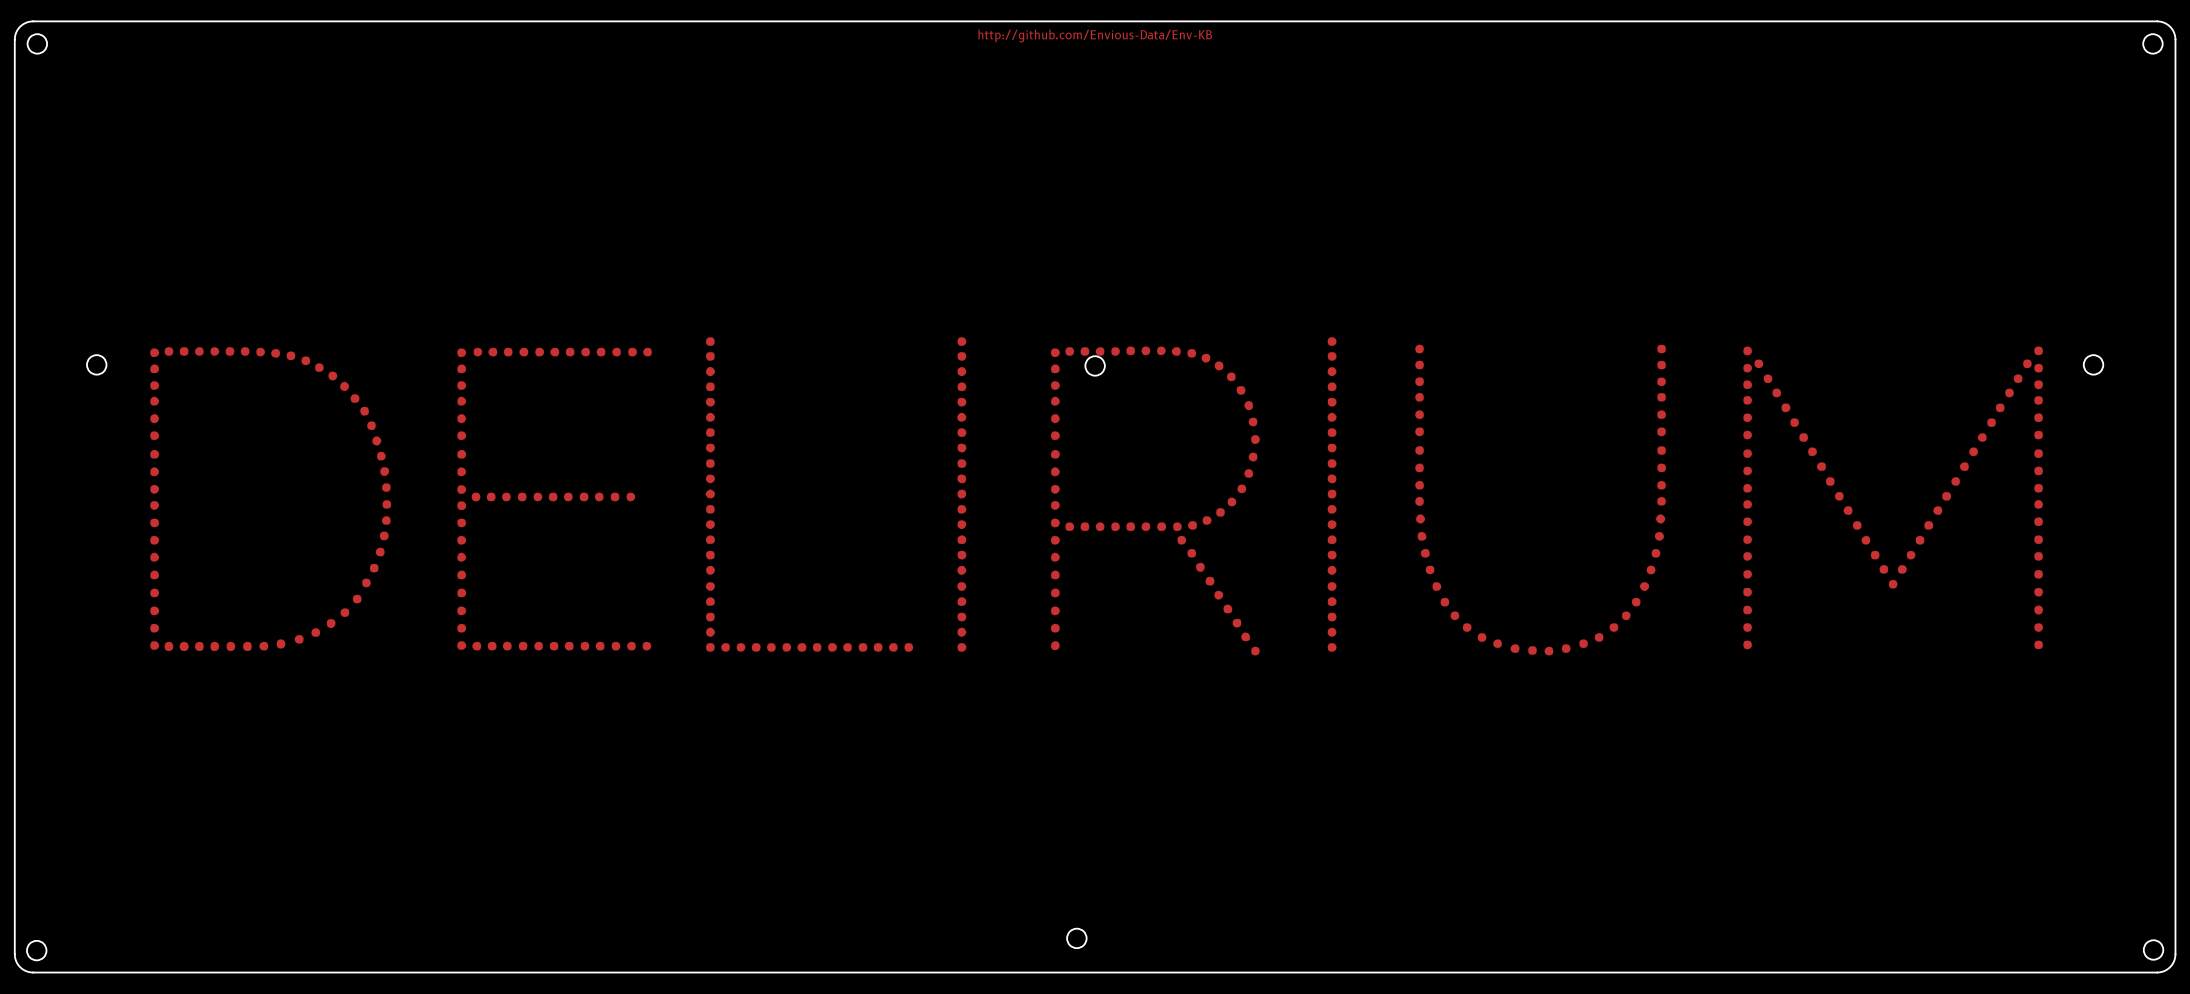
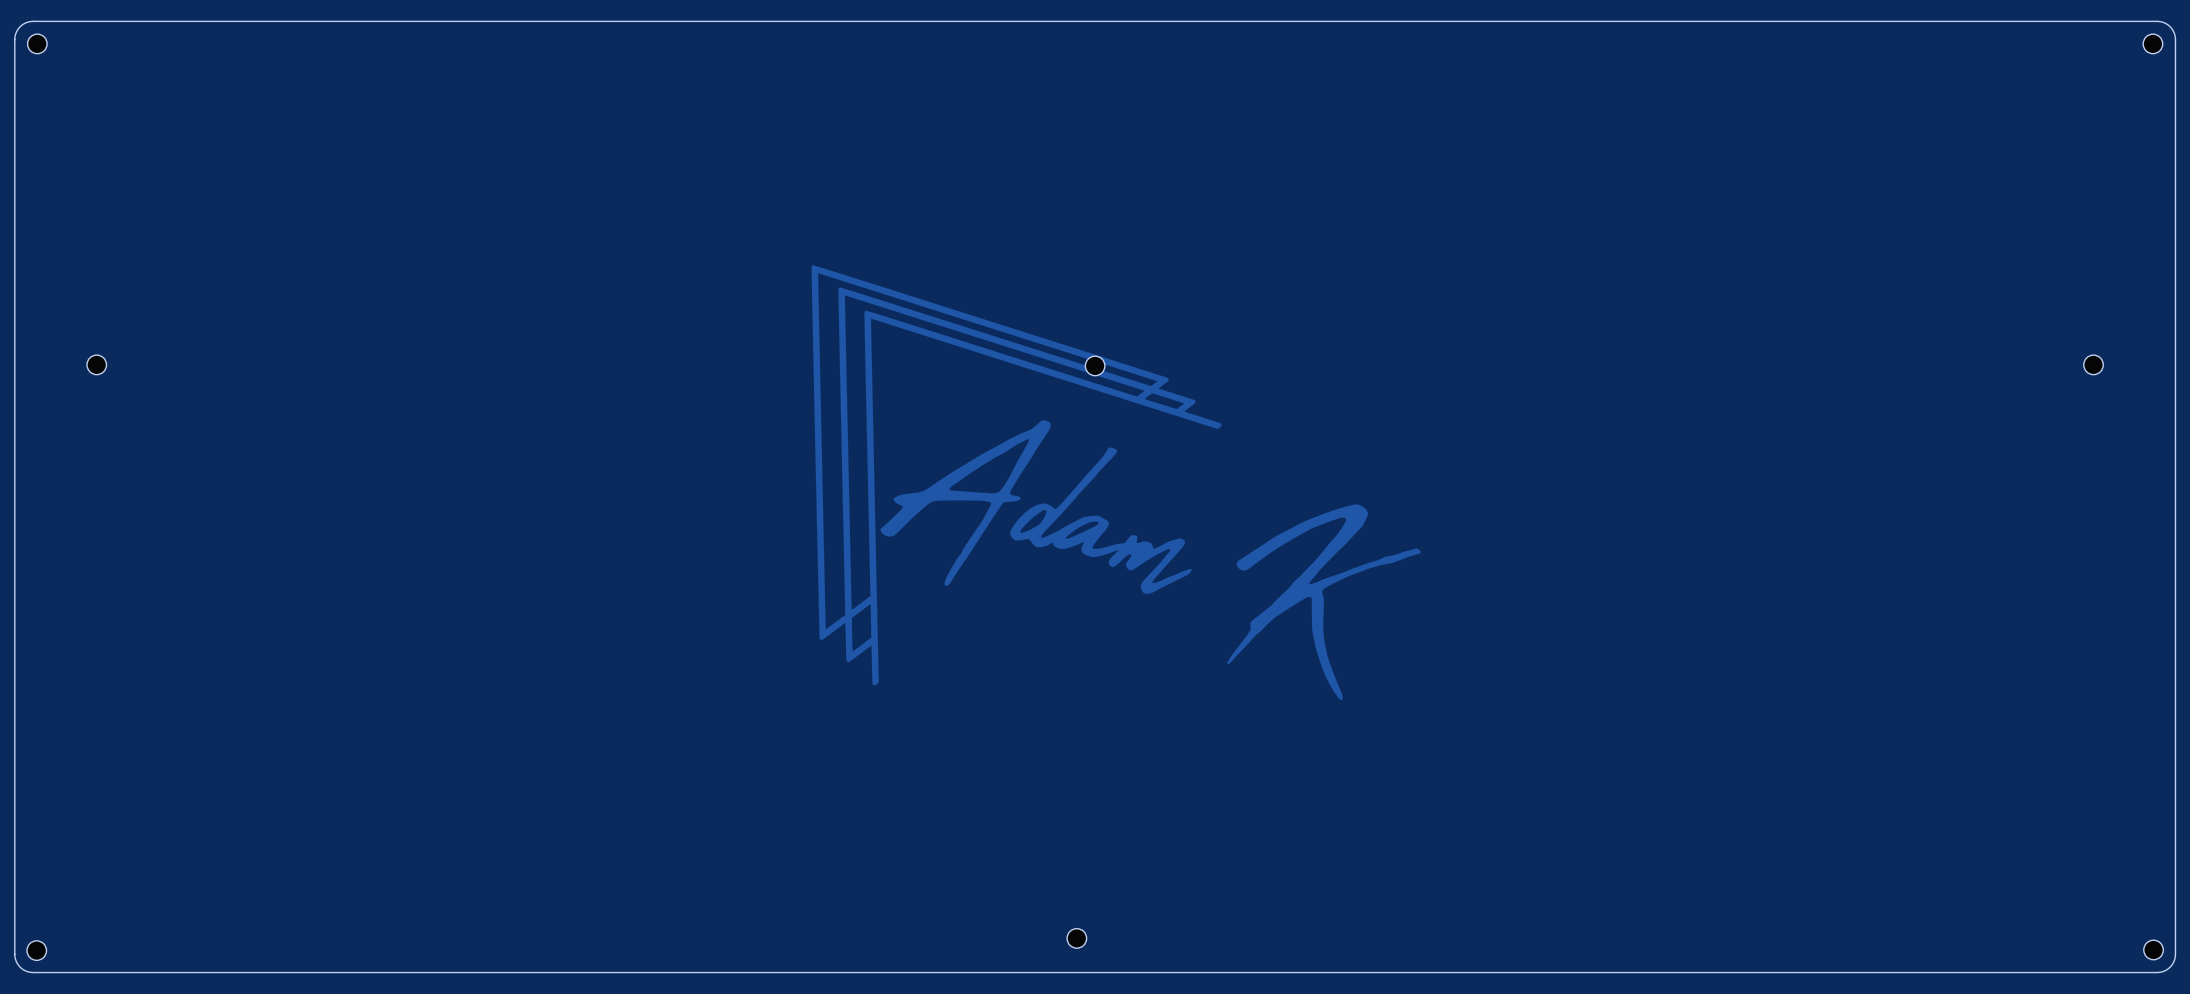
text: http://github.com/Envious-Data/Env-KB (1095, 35) -> none
drawing: none -> [811, 265, 1421, 701]
drawing: [150, 337, 2043, 656] -> none

